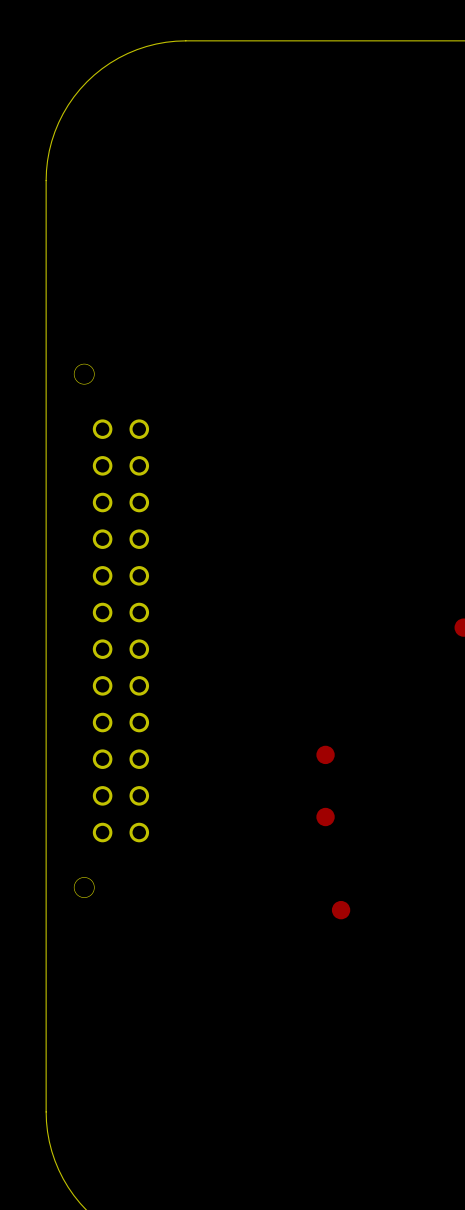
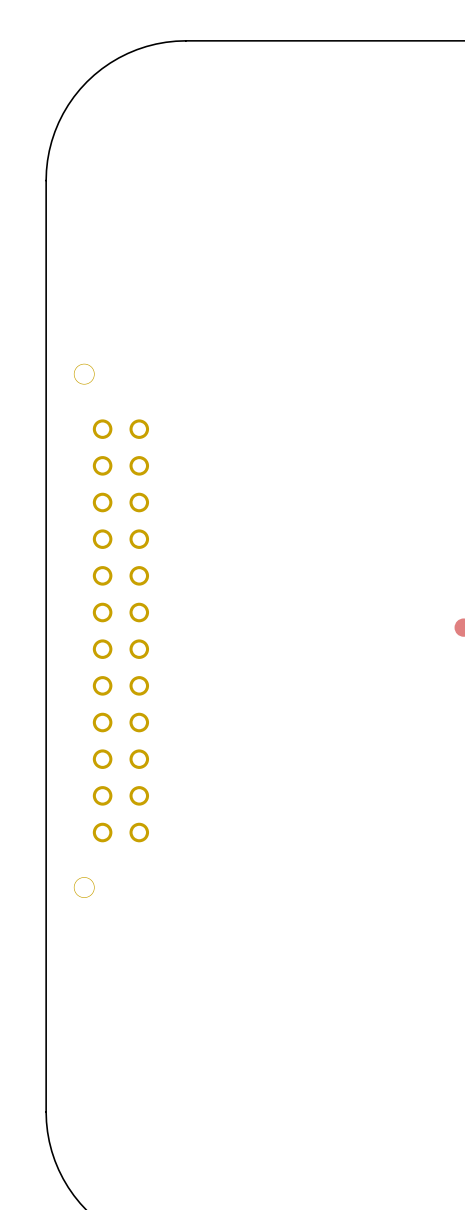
part: (325, 754) -> none
part: (325, 817) -> none
part: (341, 910) -> none

